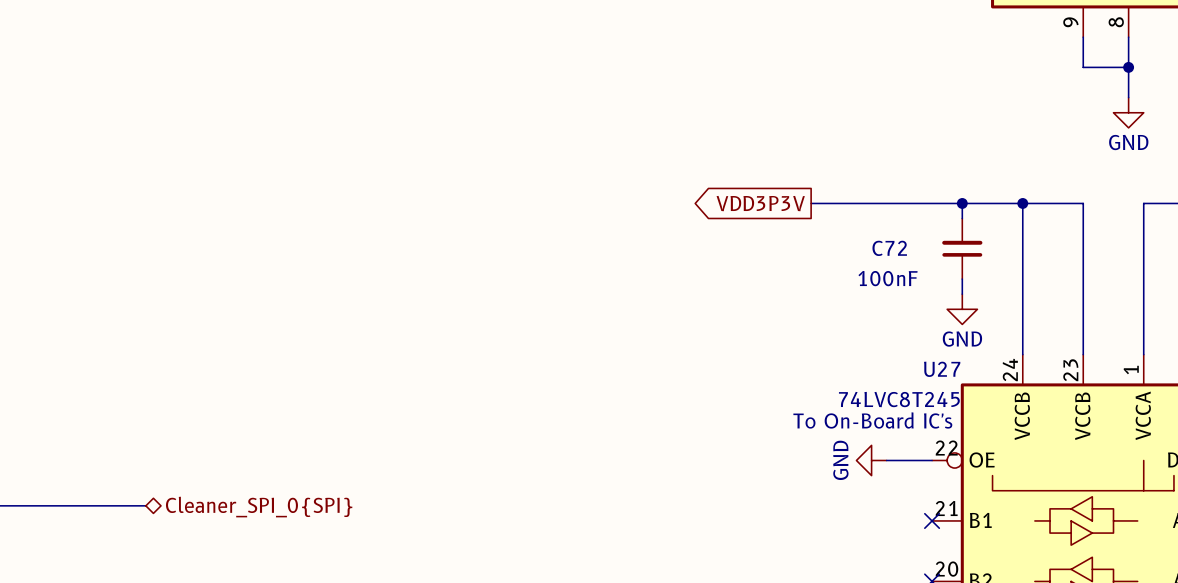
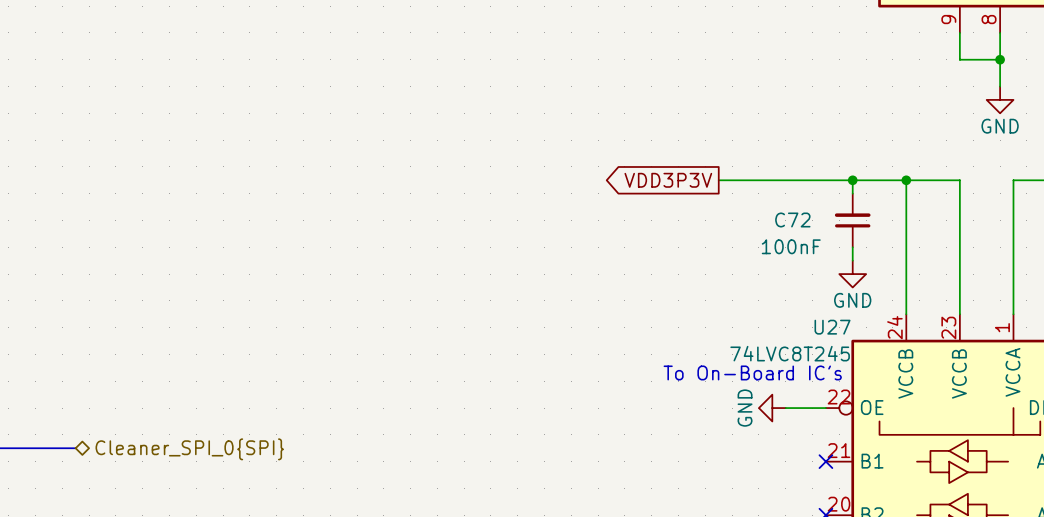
bus: (85, 505) (145, 505) -> none
hierarchical label position: Cleaner_SPI_0{SPI} (259, 507) -> Cleaner_SPI_0{SPI} (189, 449)

